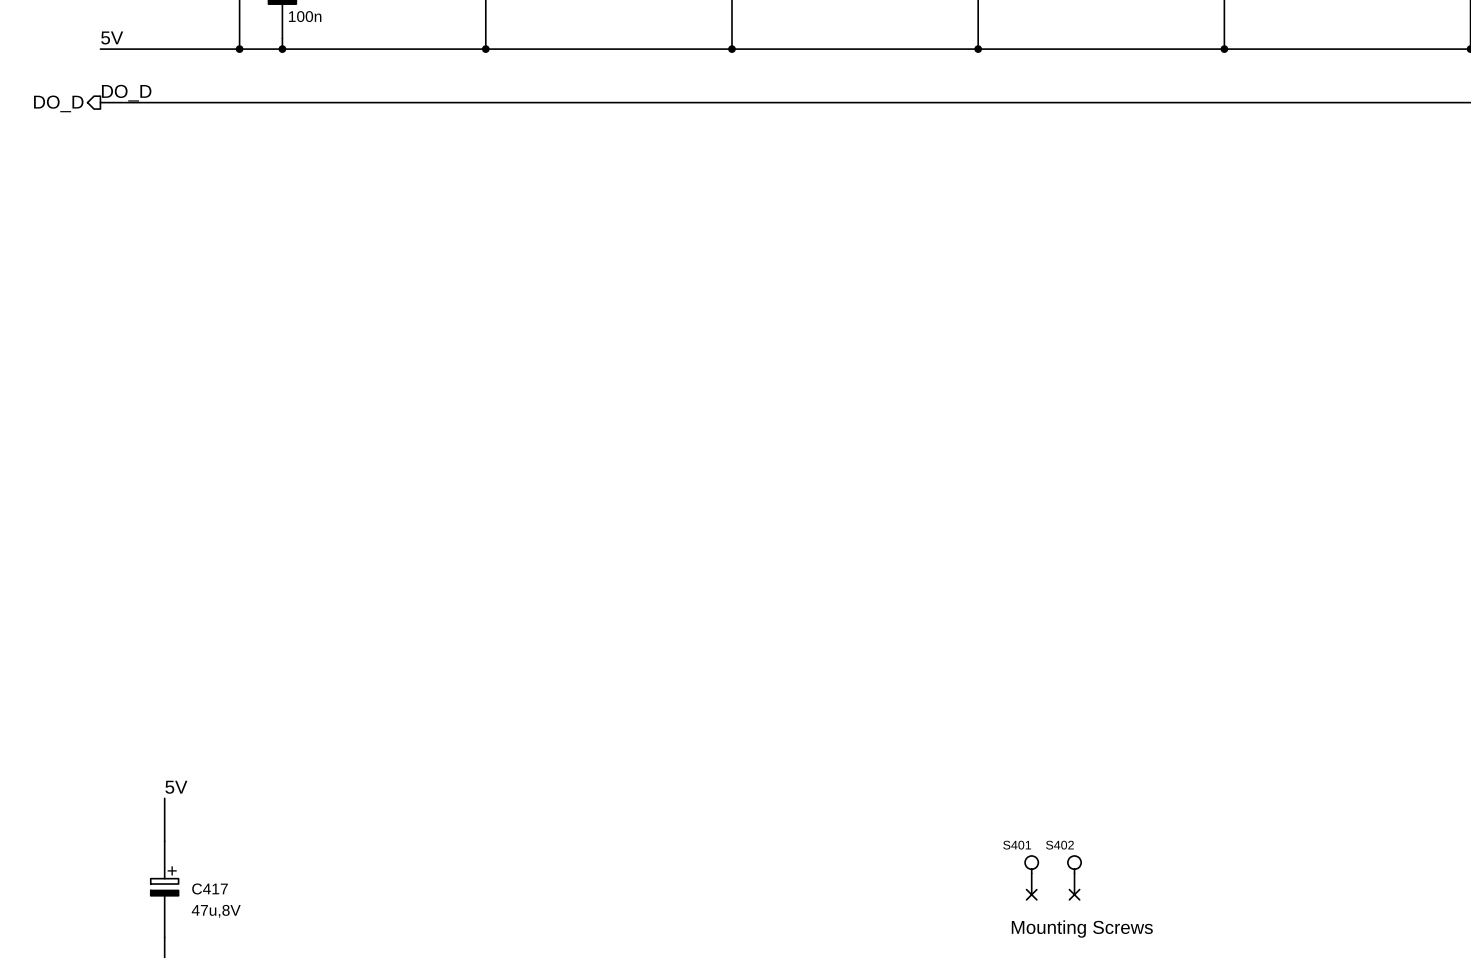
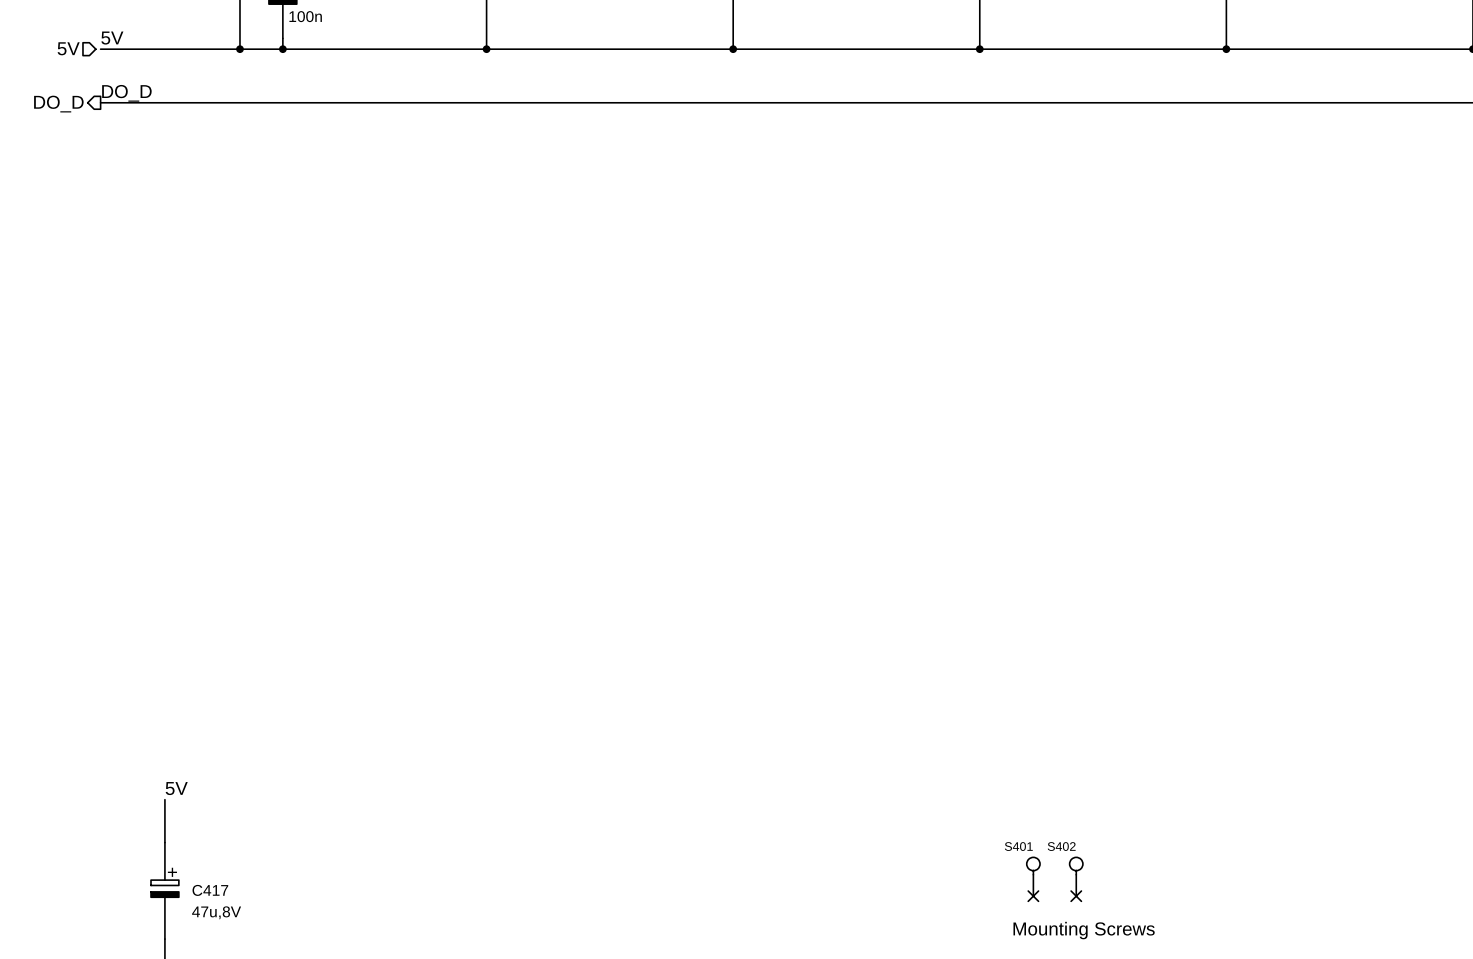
hierarchical label: none -> 5V (68, 48)

